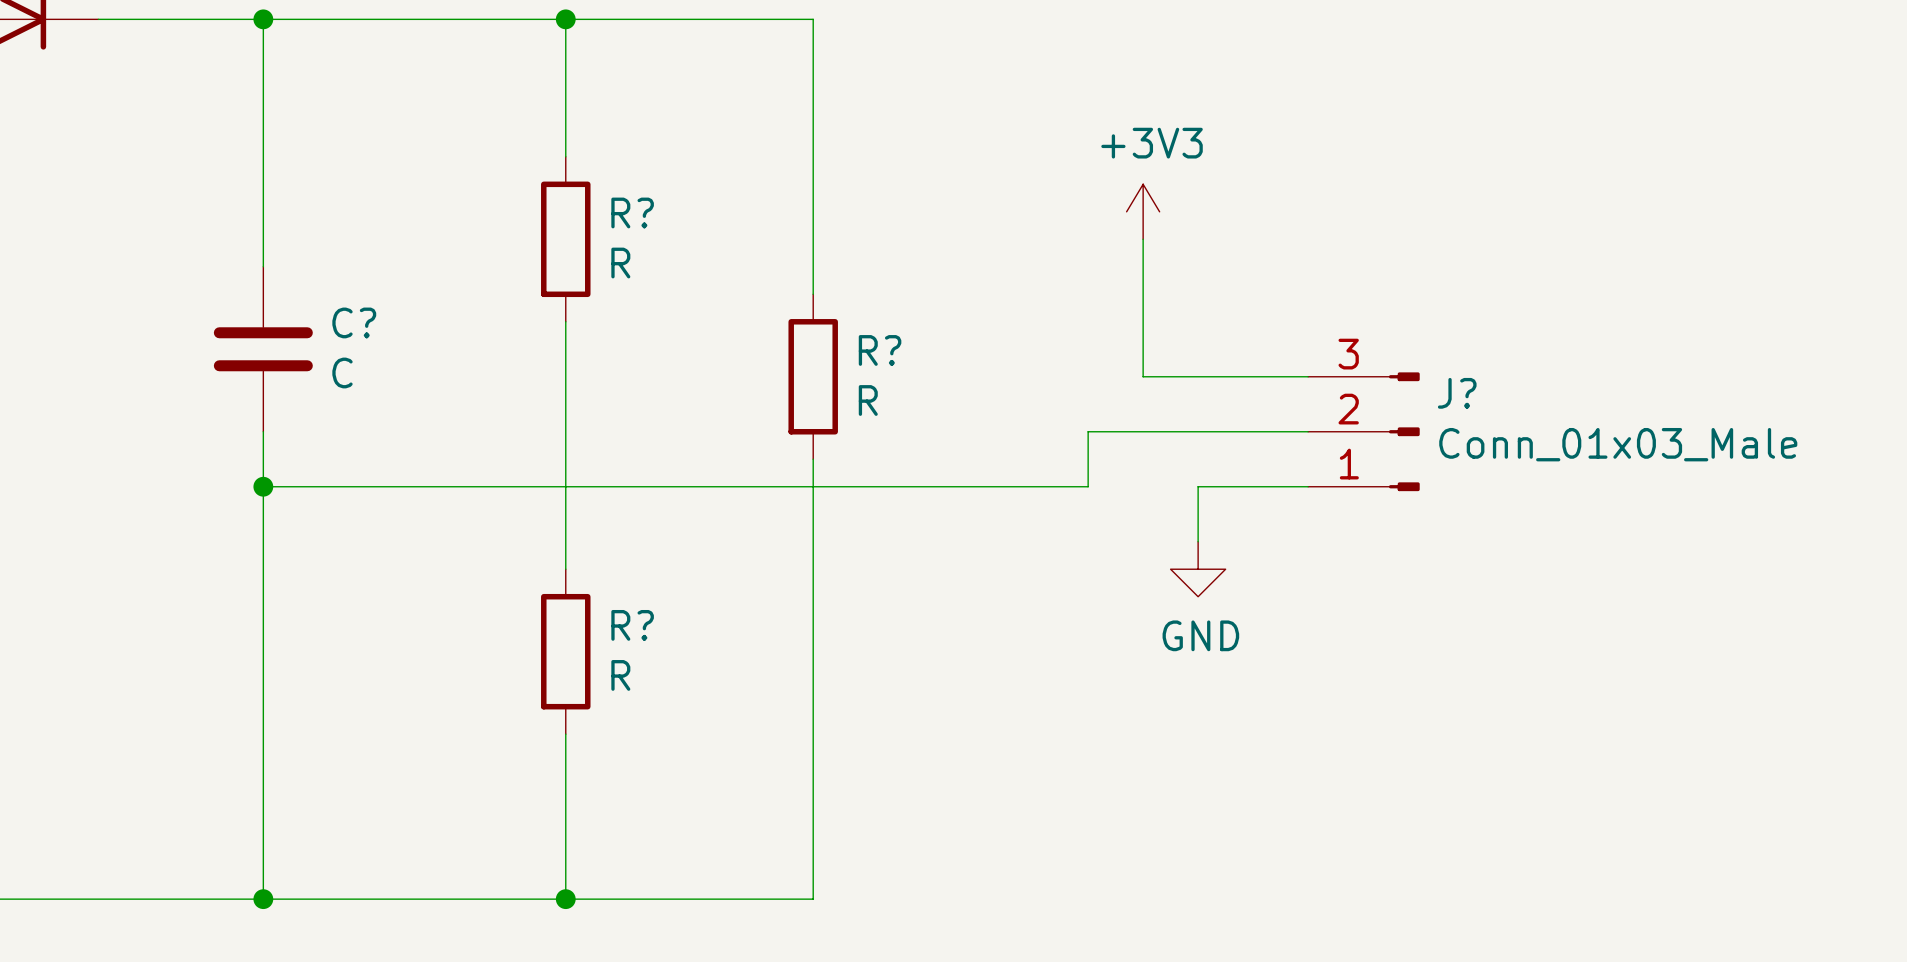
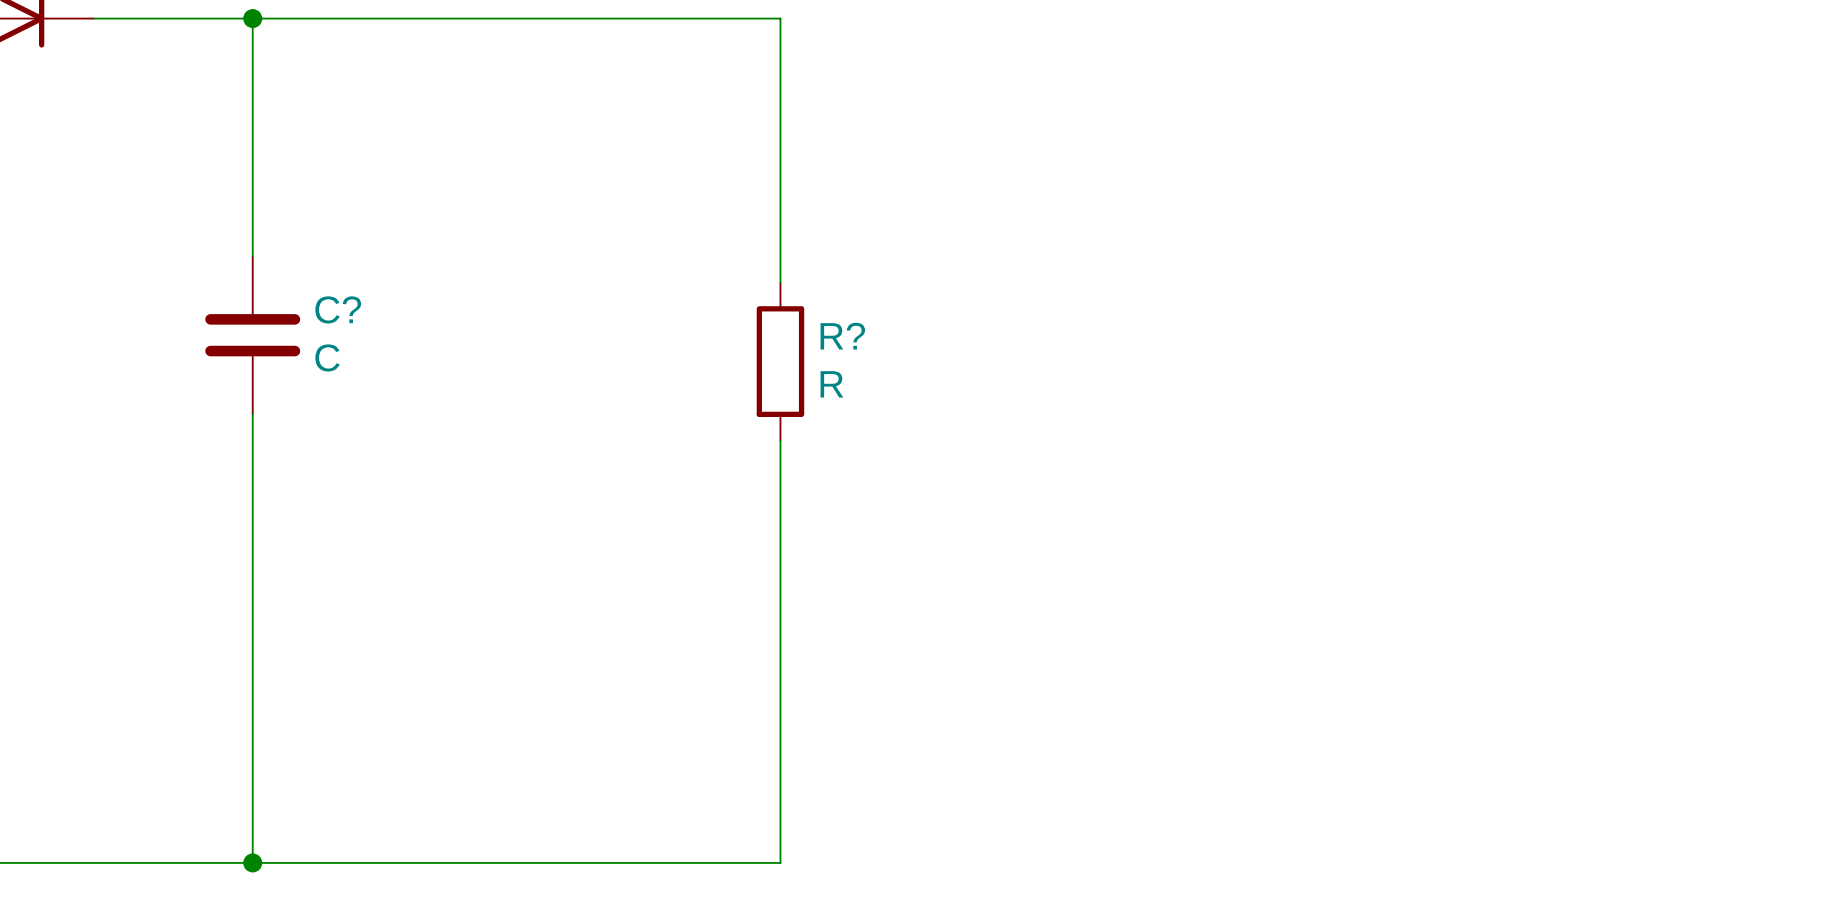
wire: (565, 19) (565, 156) -> none
junction: (565, 19) -> none
power symbol: +3V3 (1143, 211) -> none
R?: R (565, 239) -> none
wire: (1143, 239) (1143, 376) (1308, 376) -> none
wire: (565, 321) (565, 569) -> none
wire: (1308, 431) (1088, 431) (1088, 486) (263, 486) -> none
J?: Conn_01x03_Male (1363, 431) -> none
junction: (263, 486) -> none
wire: (1308, 486) (1198, 486) (1198, 541) -> none
power symbol: GND (1198, 569) -> none
R?: R (565, 651) -> none
wire: (565, 734) (565, 899) -> none
junction: (565, 899) -> none

